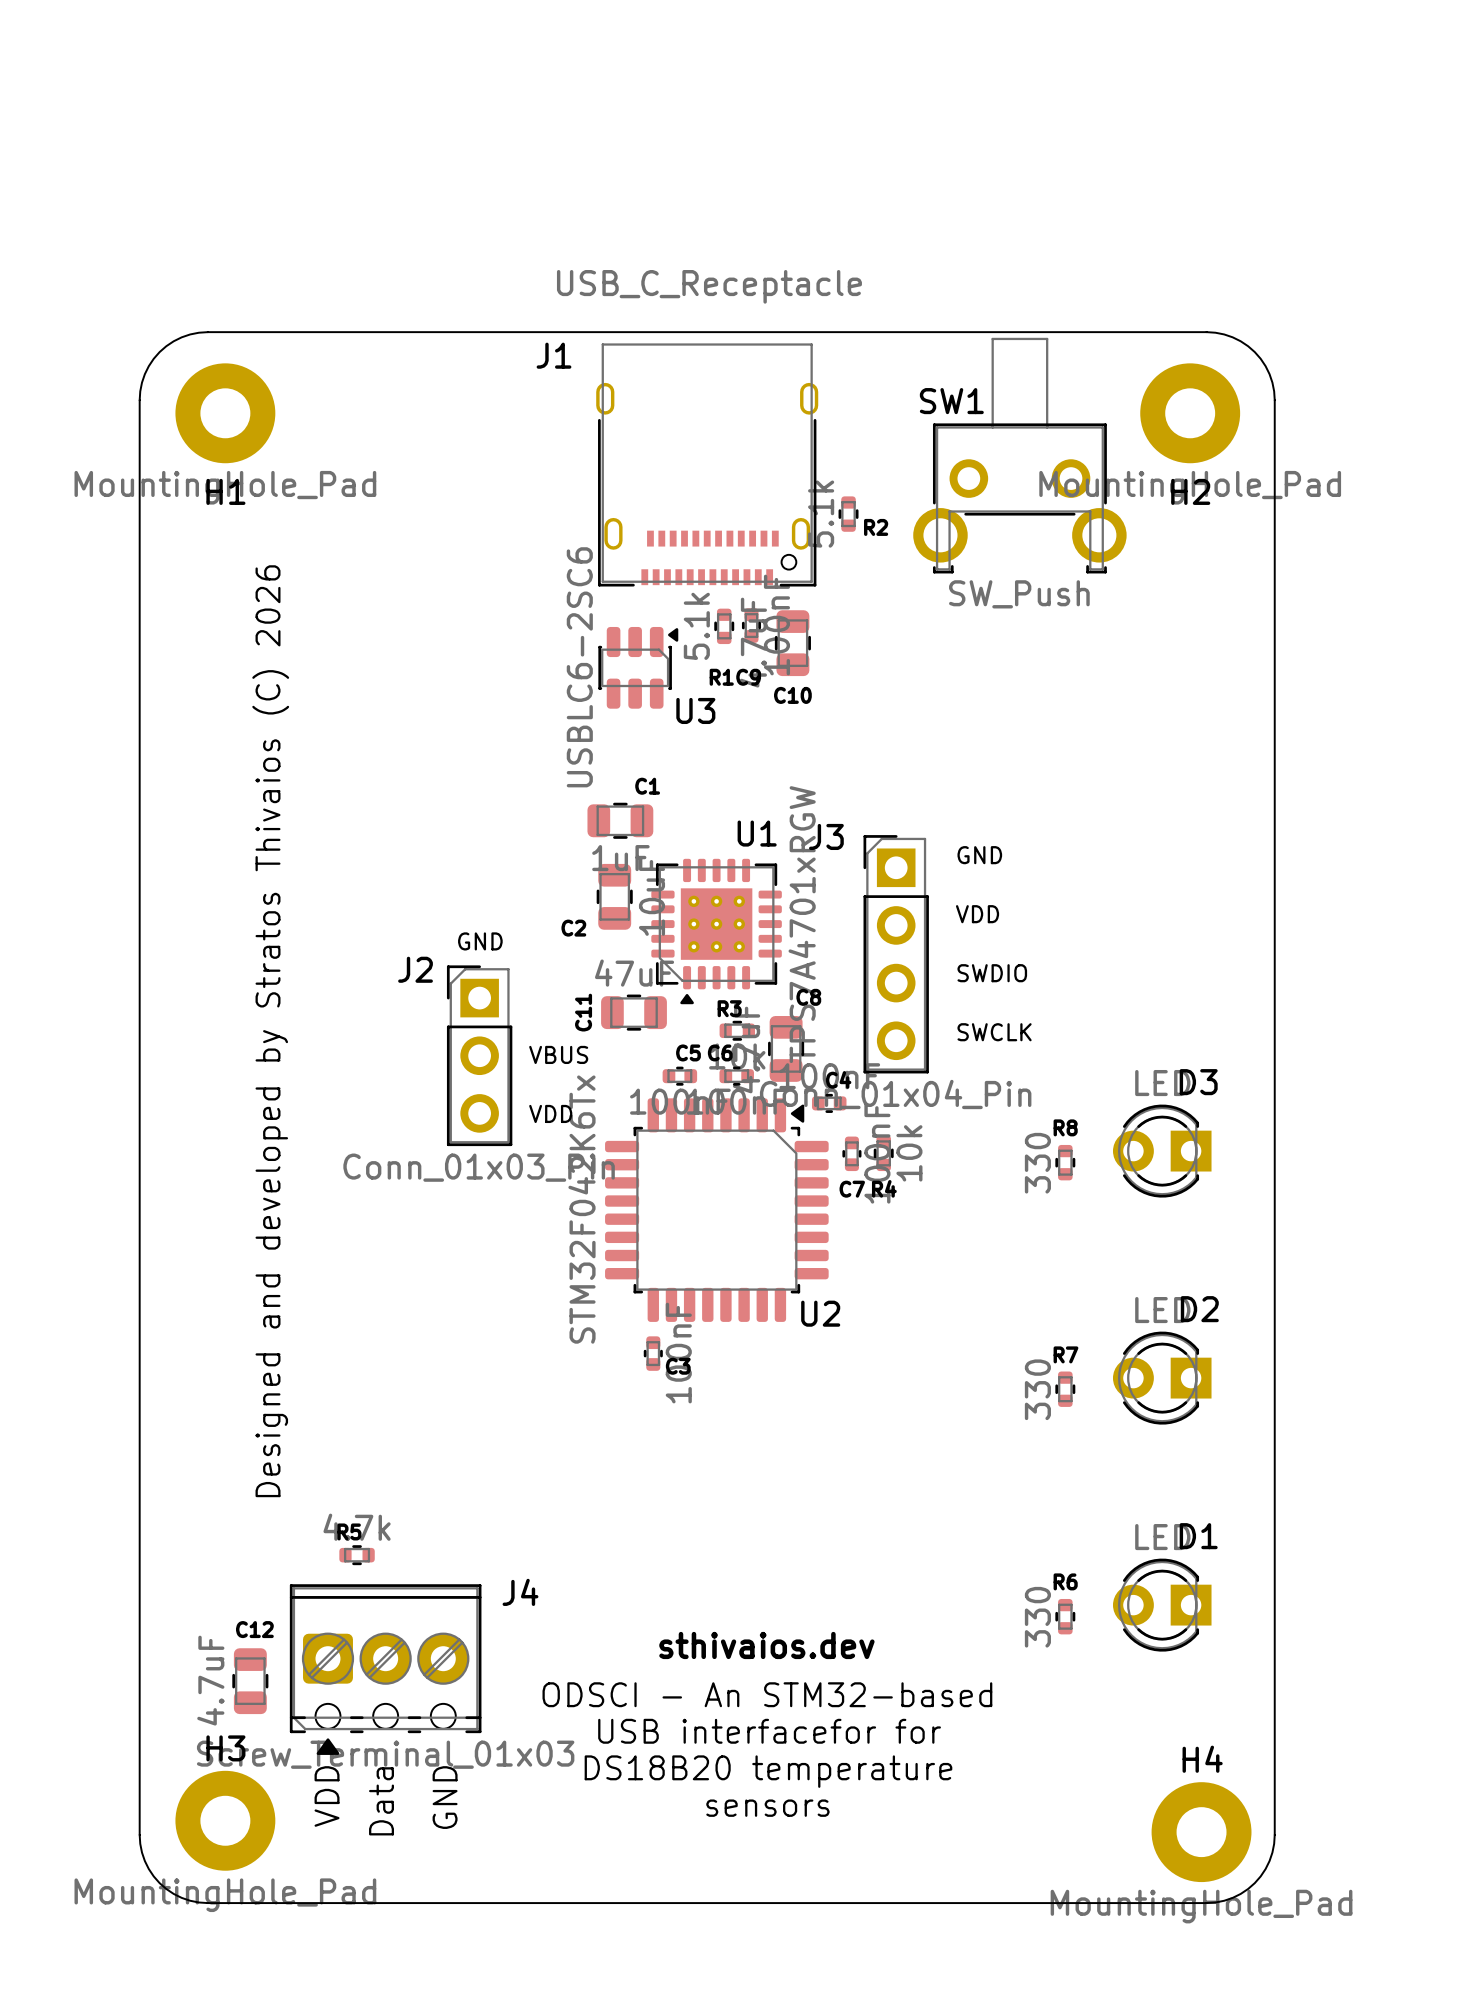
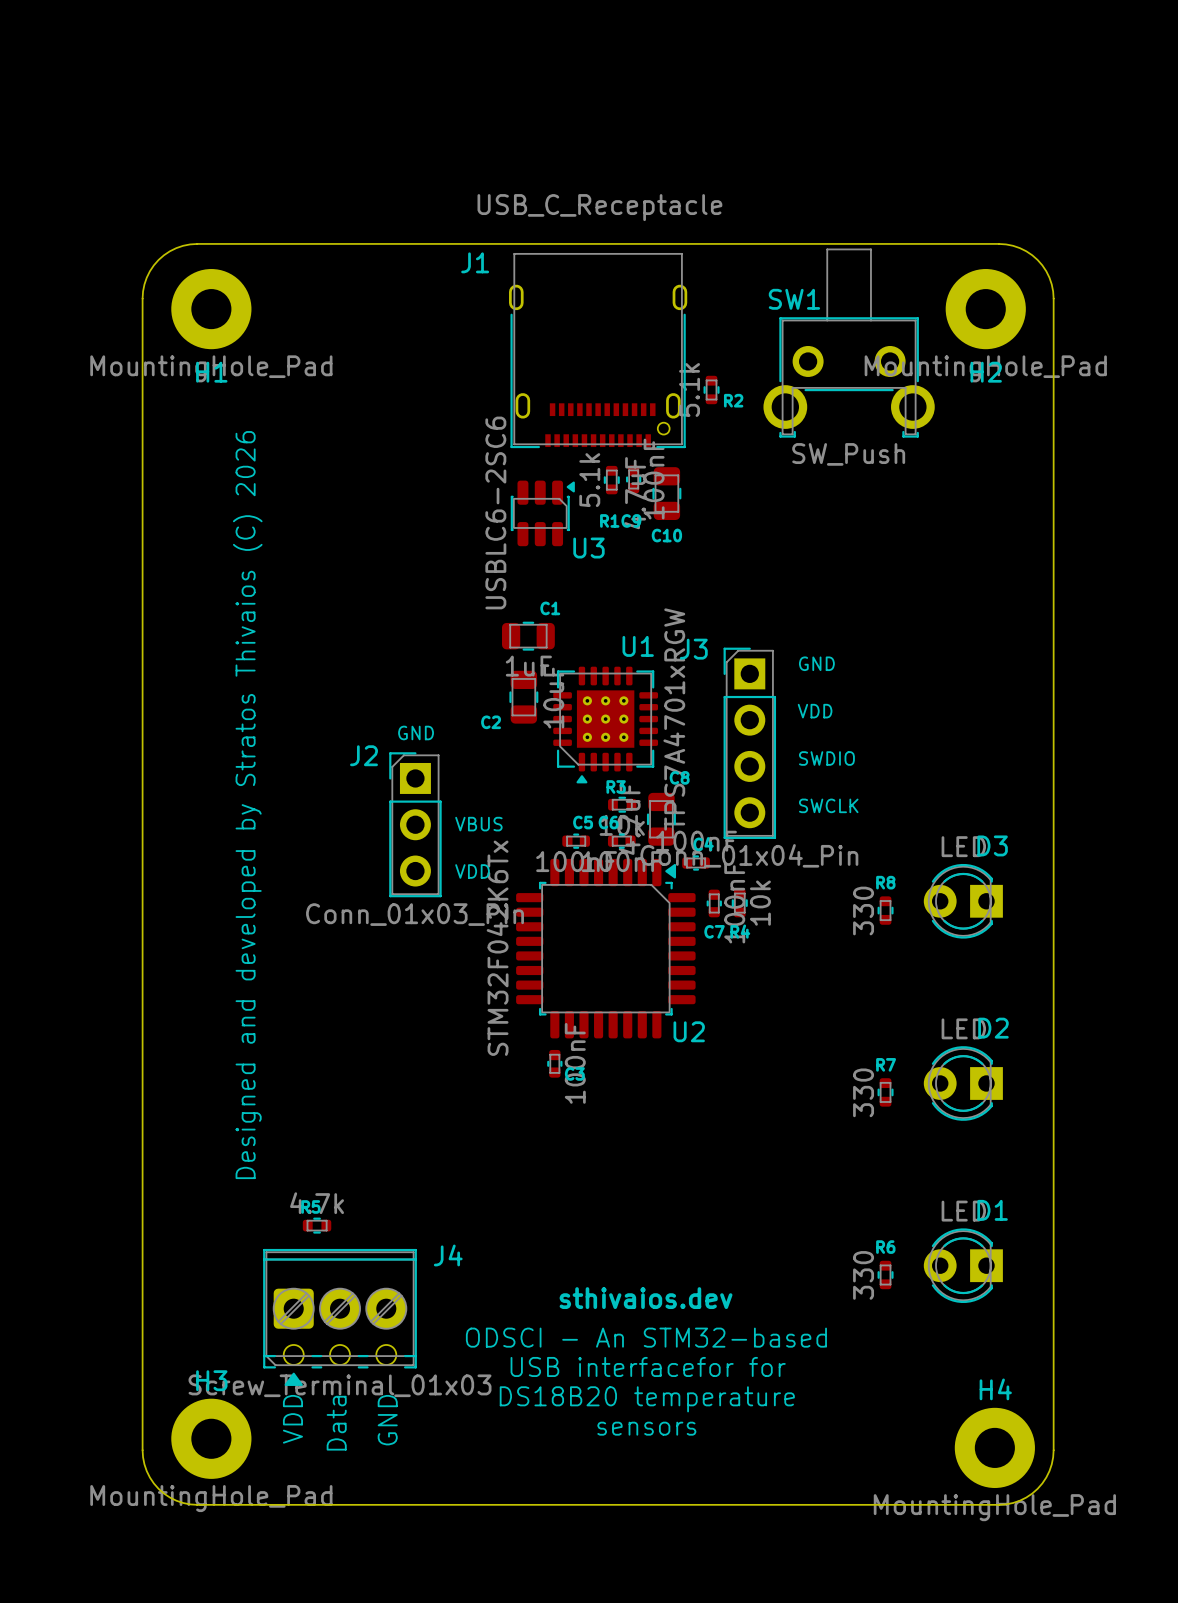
C11: 47uF (634, 1012) -> none
C12: 4.7uF (250, 1681) -> none

